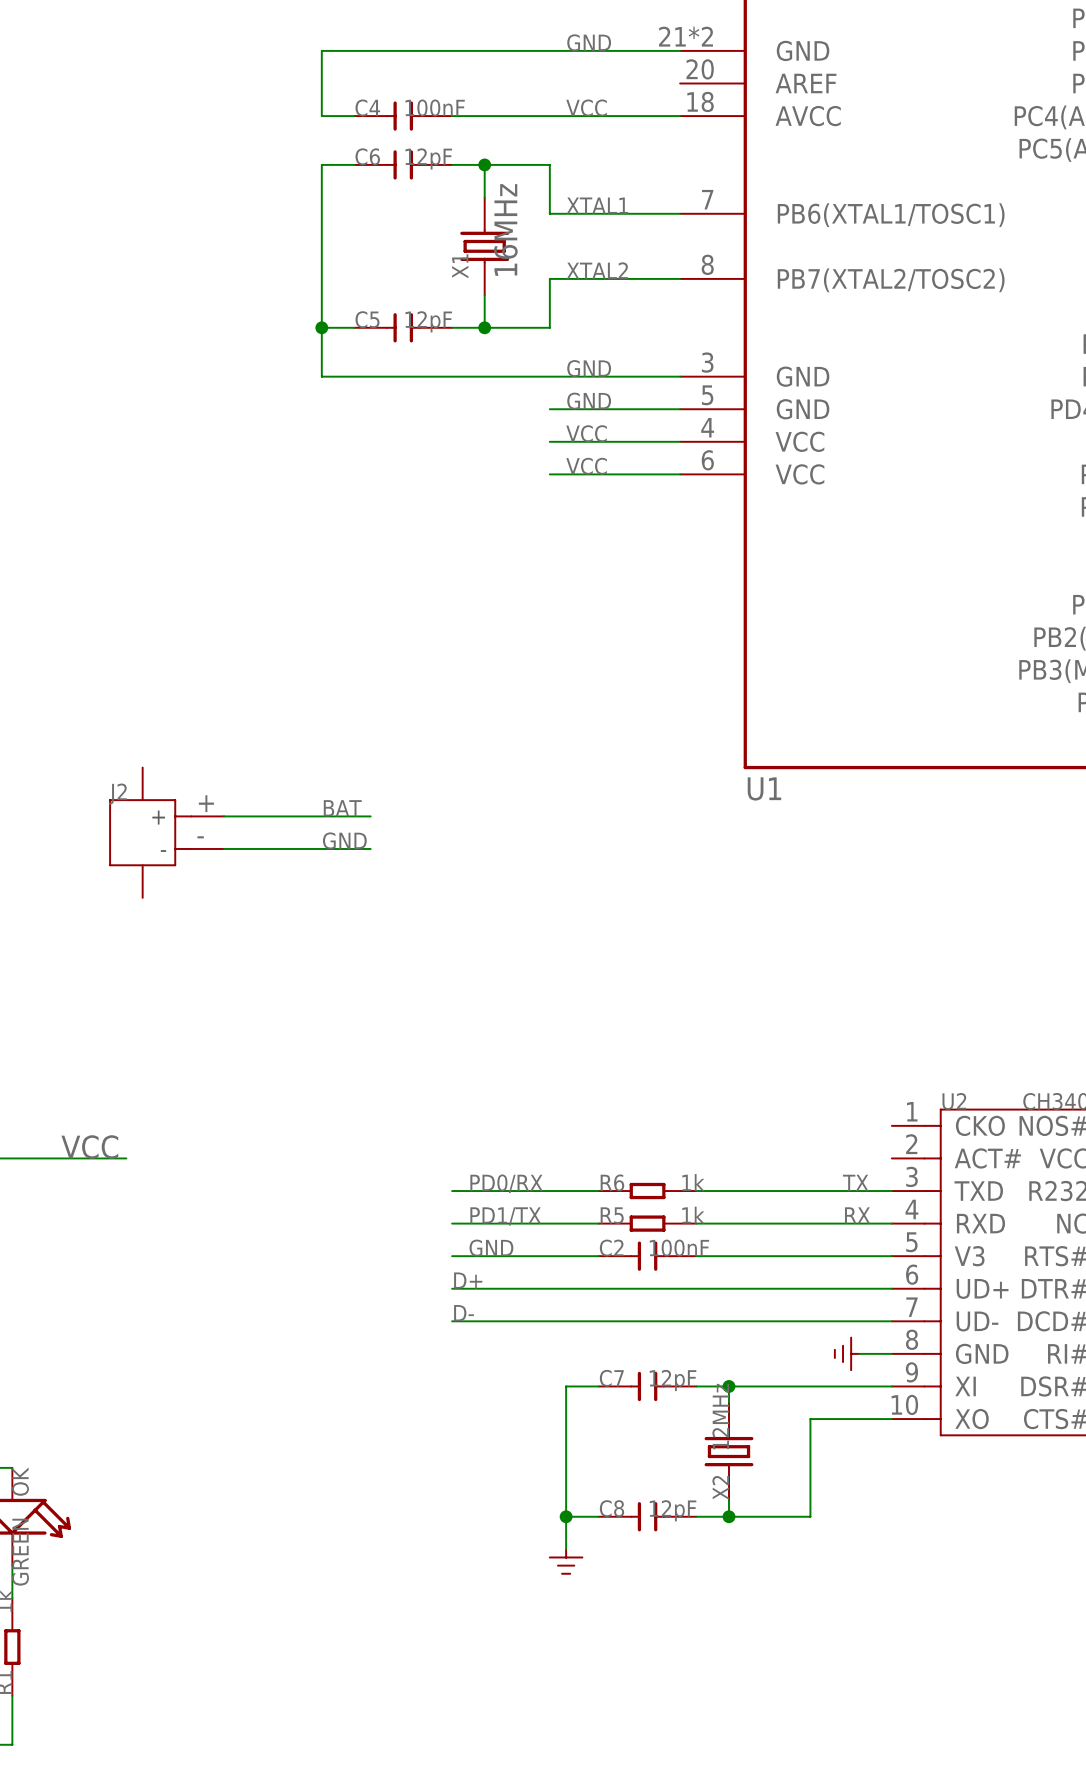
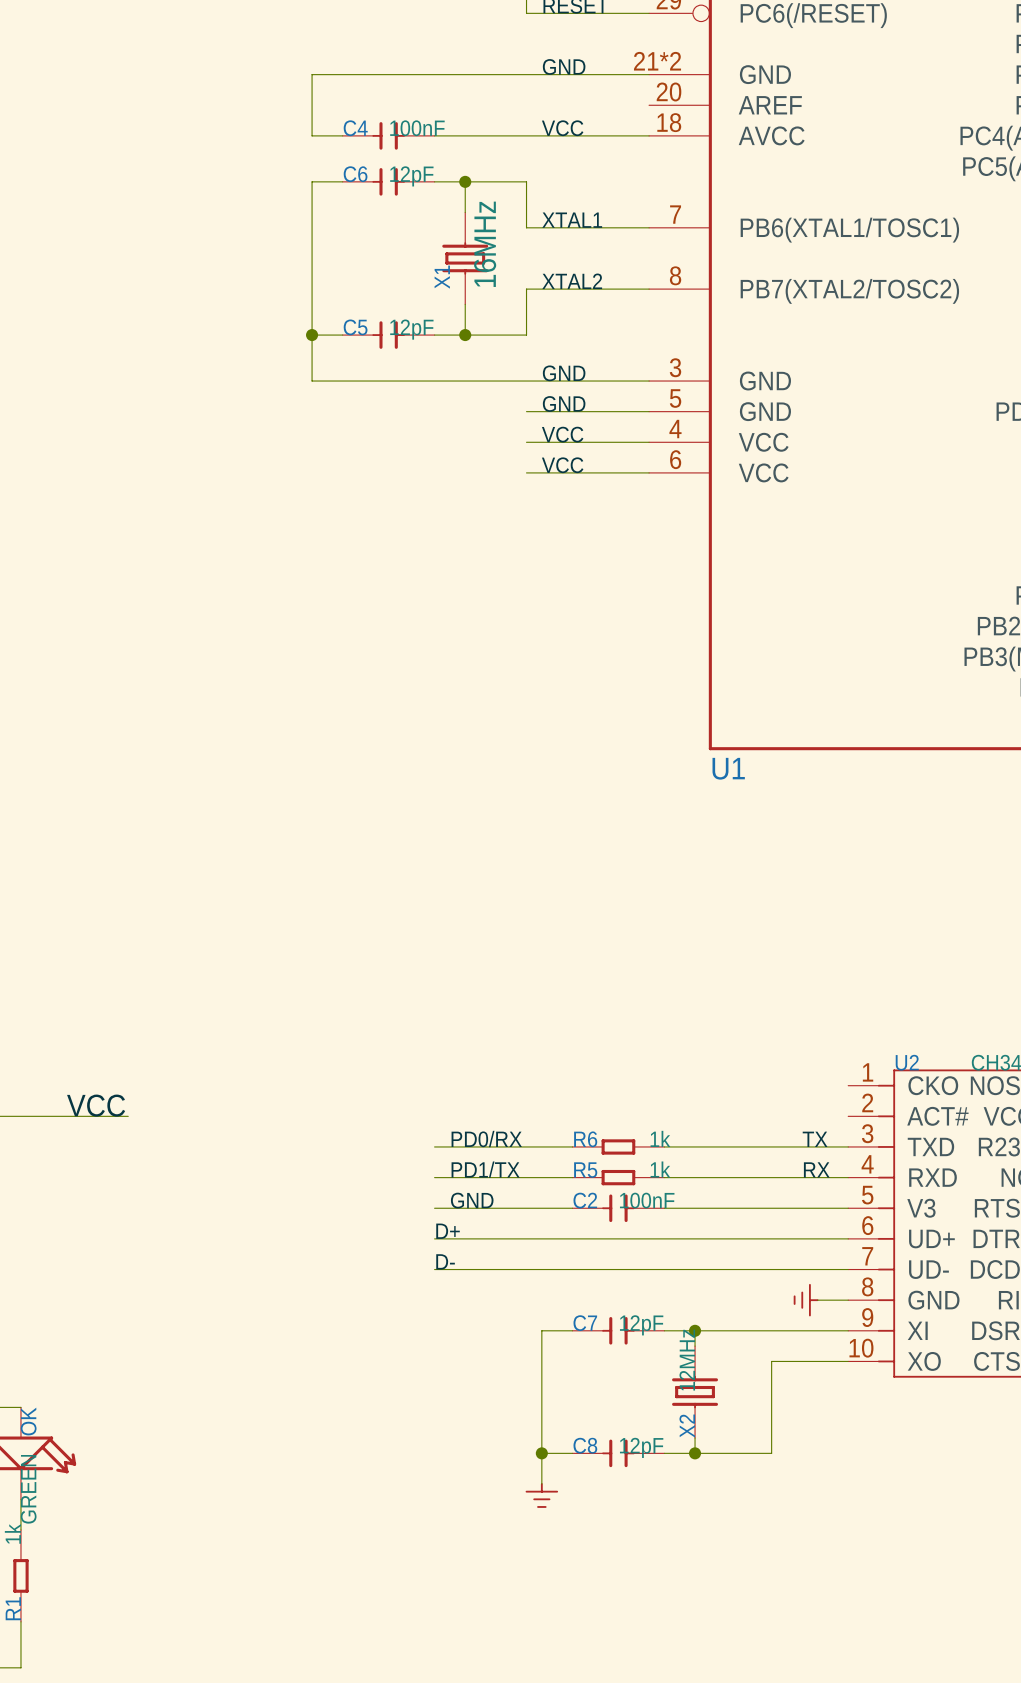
label: BAT (342, 808) -> none
wire: (224, 816) (370, 816) -> none
J2: (166, 832) -> none
label: GND (344, 840) -> none
wire: (224, 848) (370, 848) -> none

